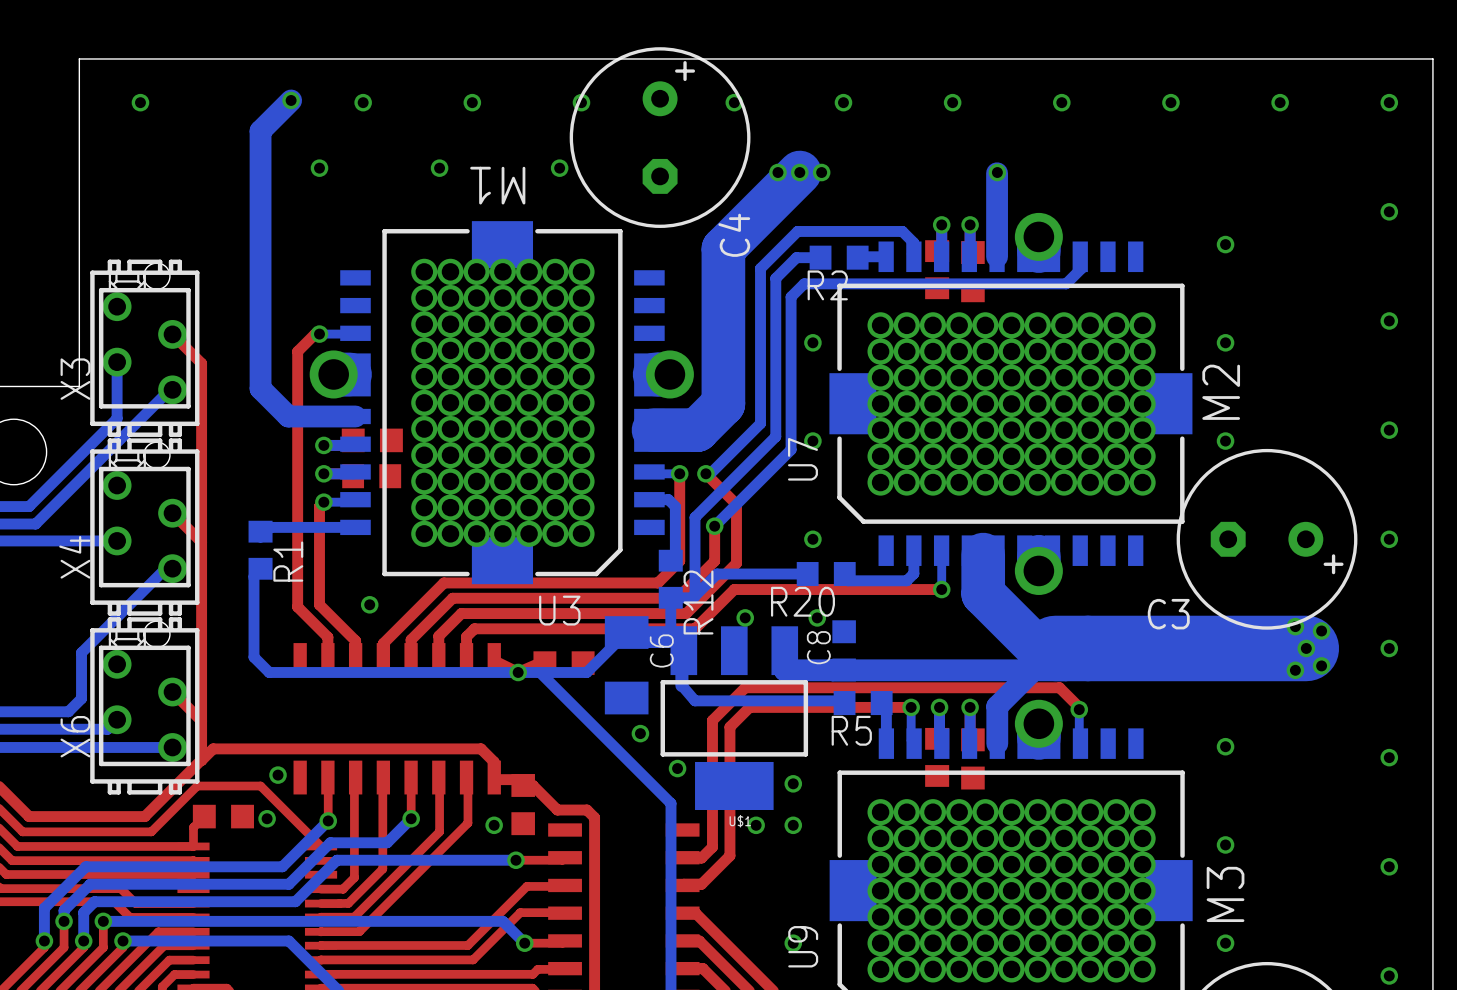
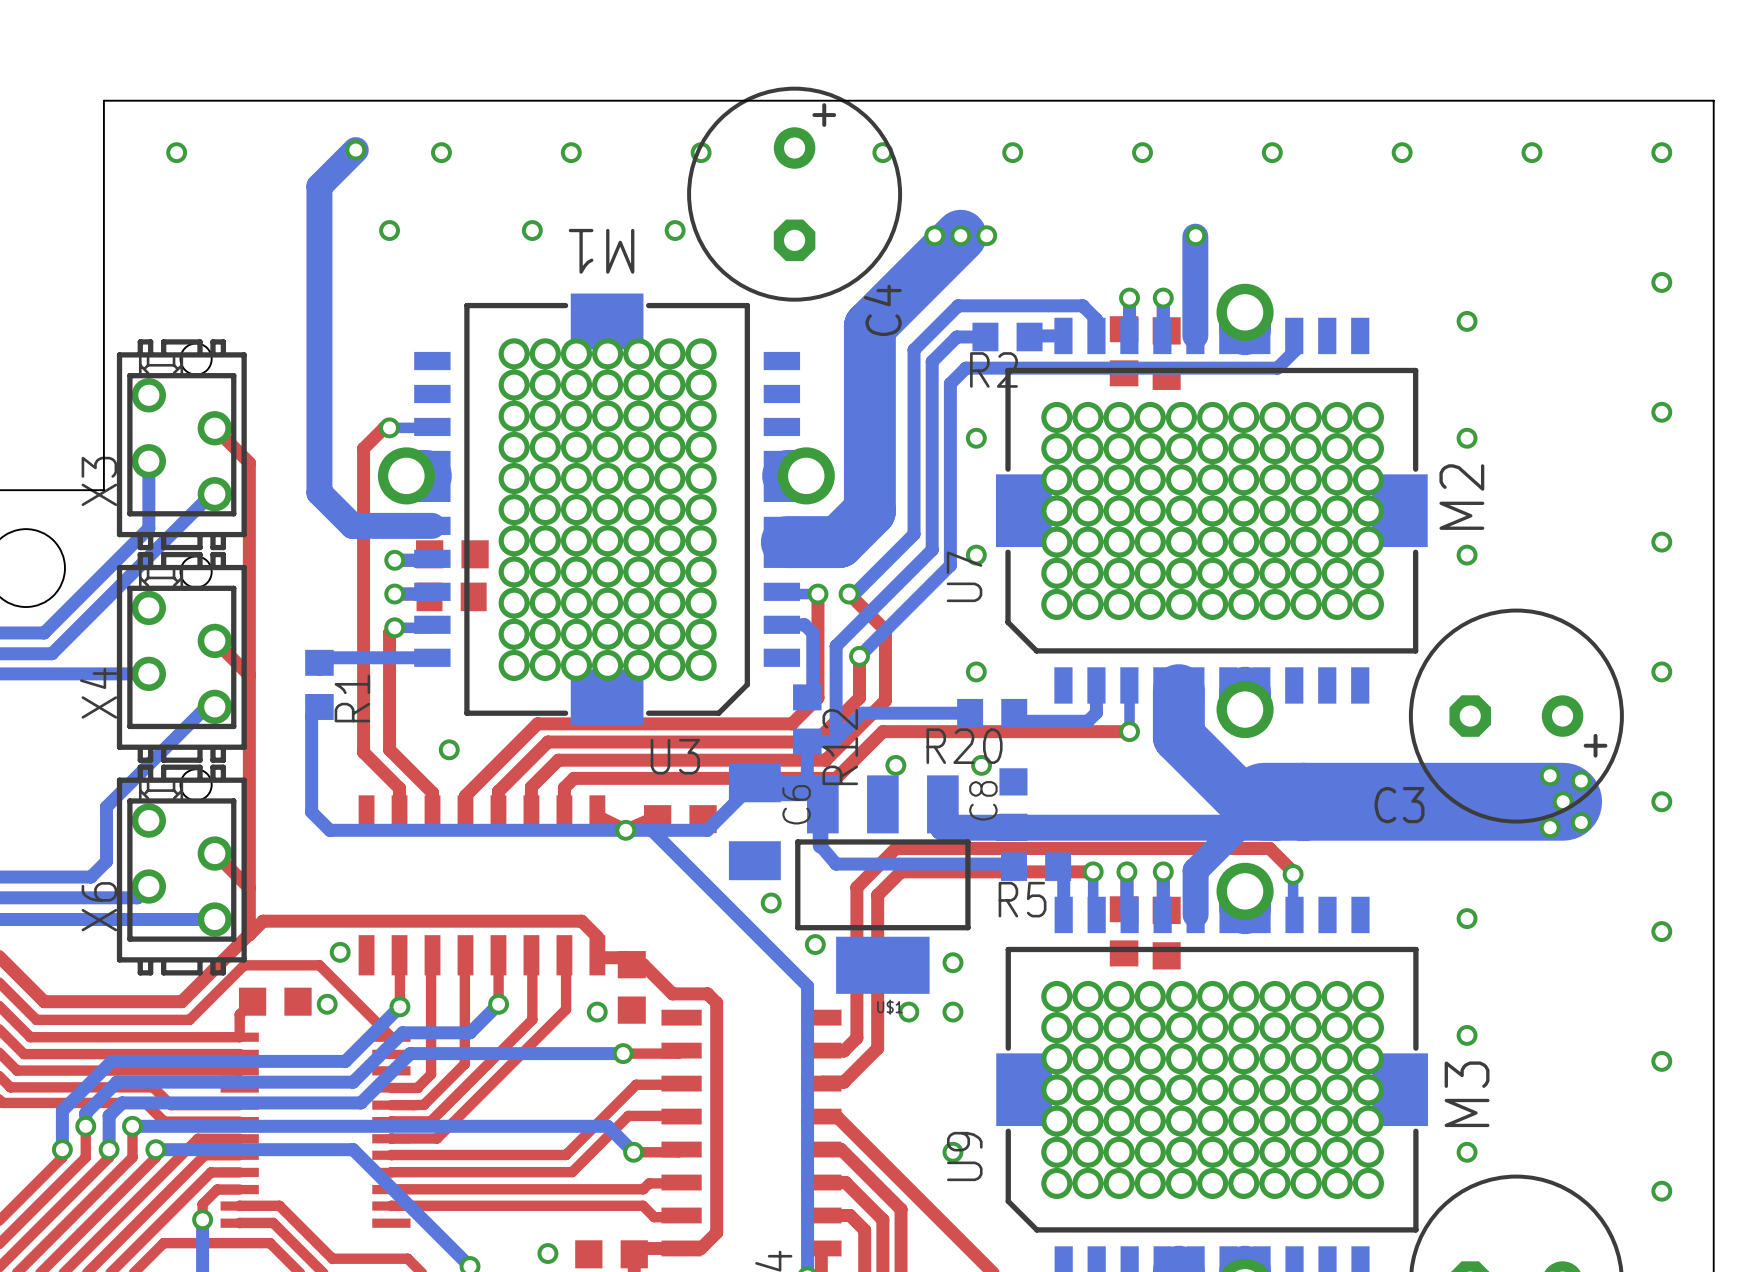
C3 position: (1267, 539) -> (1516, 716)

